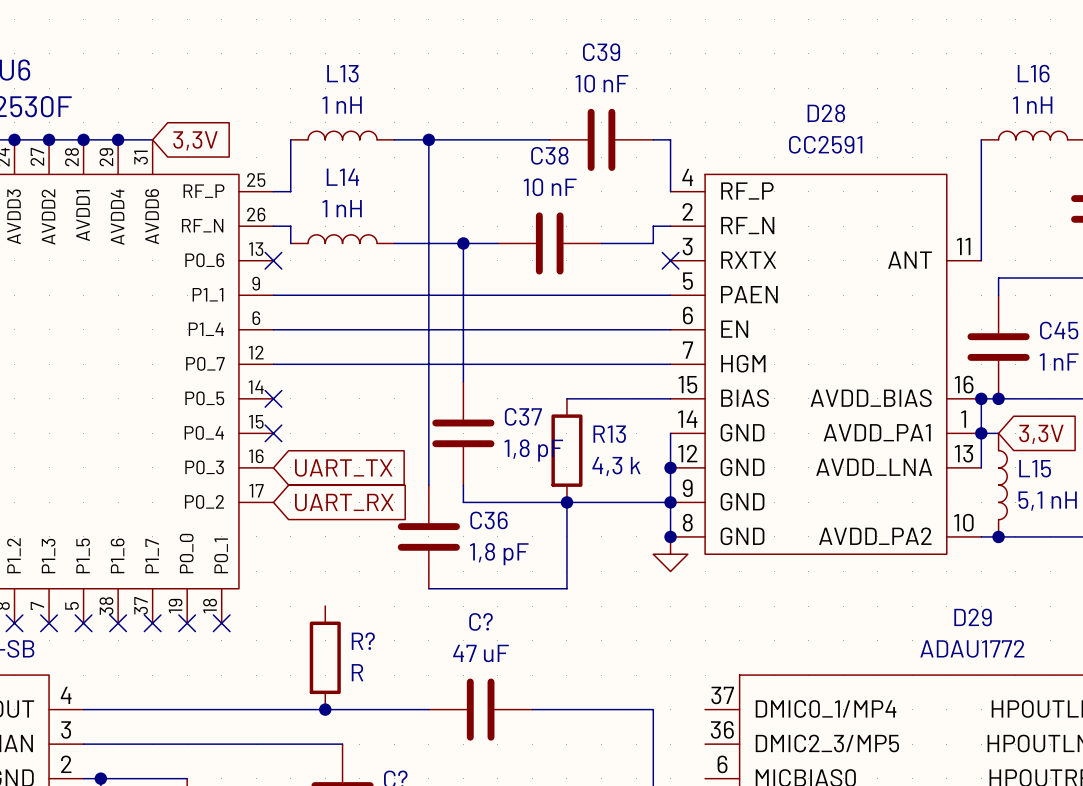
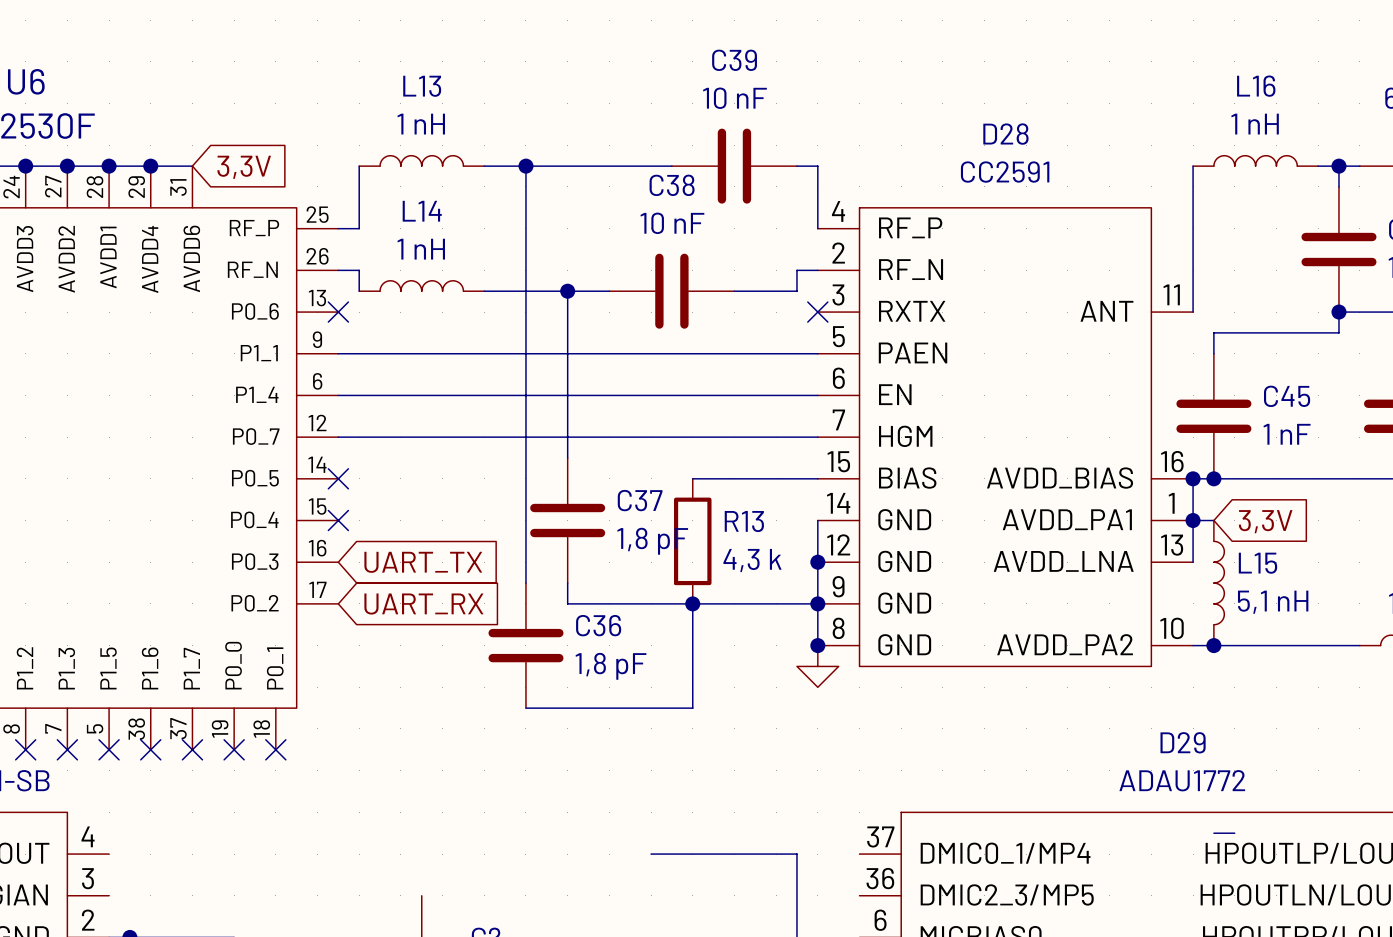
R?: R (325, 657) -> none
wire: none -> (1213, 833) (1234, 833)
wire: (83, 709) (428, 709) -> none
junction: (325, 709) -> none
C?: 47 uF (480, 709) -> none
wire: (83, 744) (342, 744) -> none

